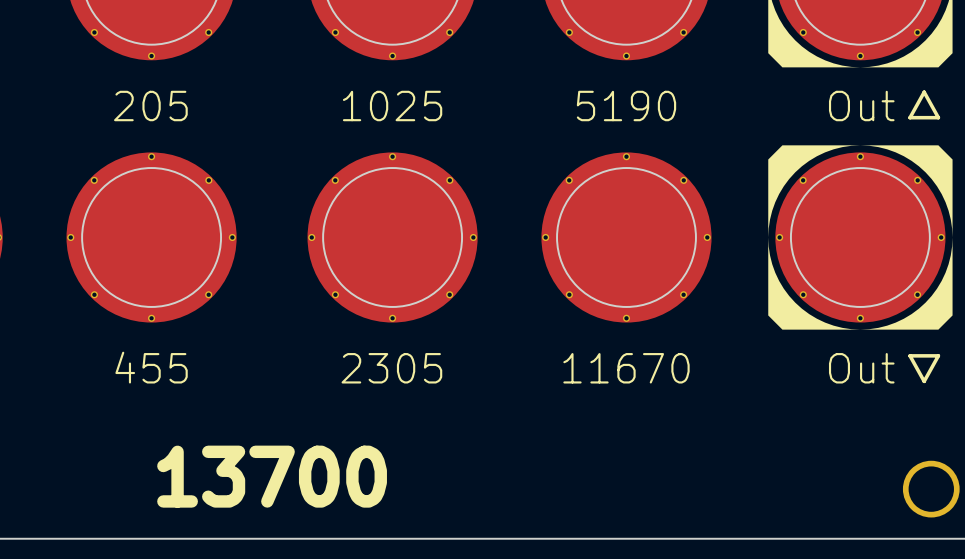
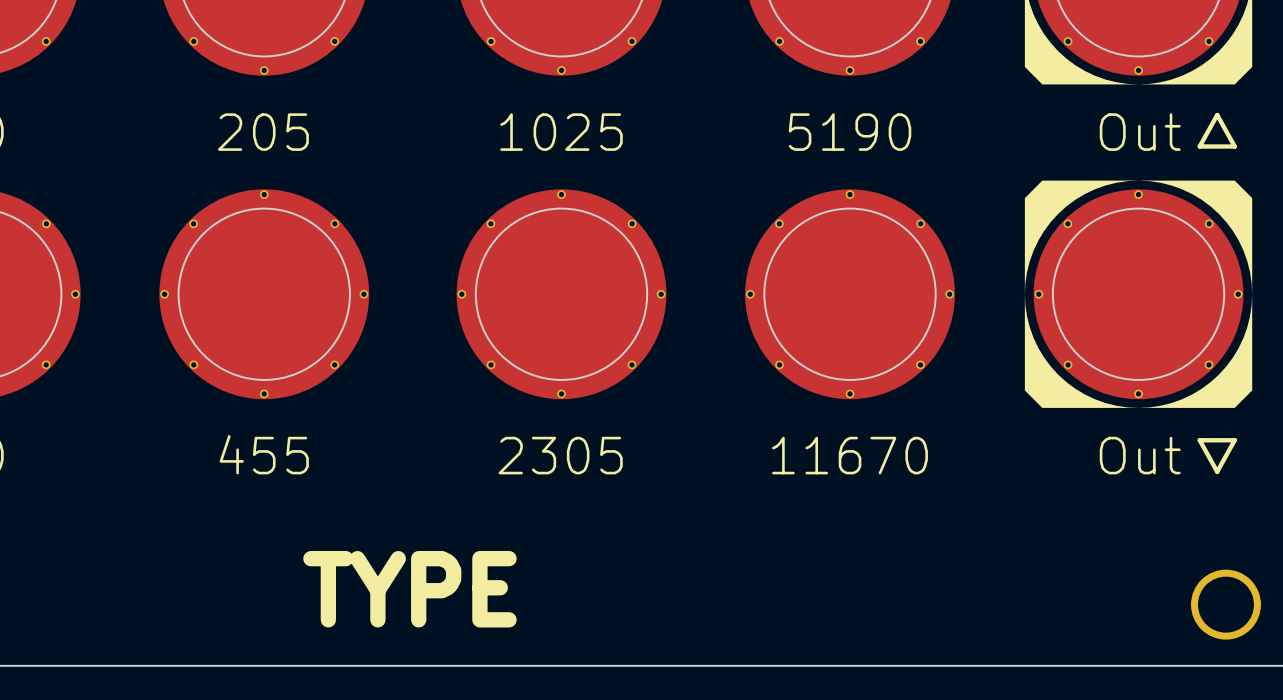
text: 13700 (272, 476) -> TYPE (409, 589)

